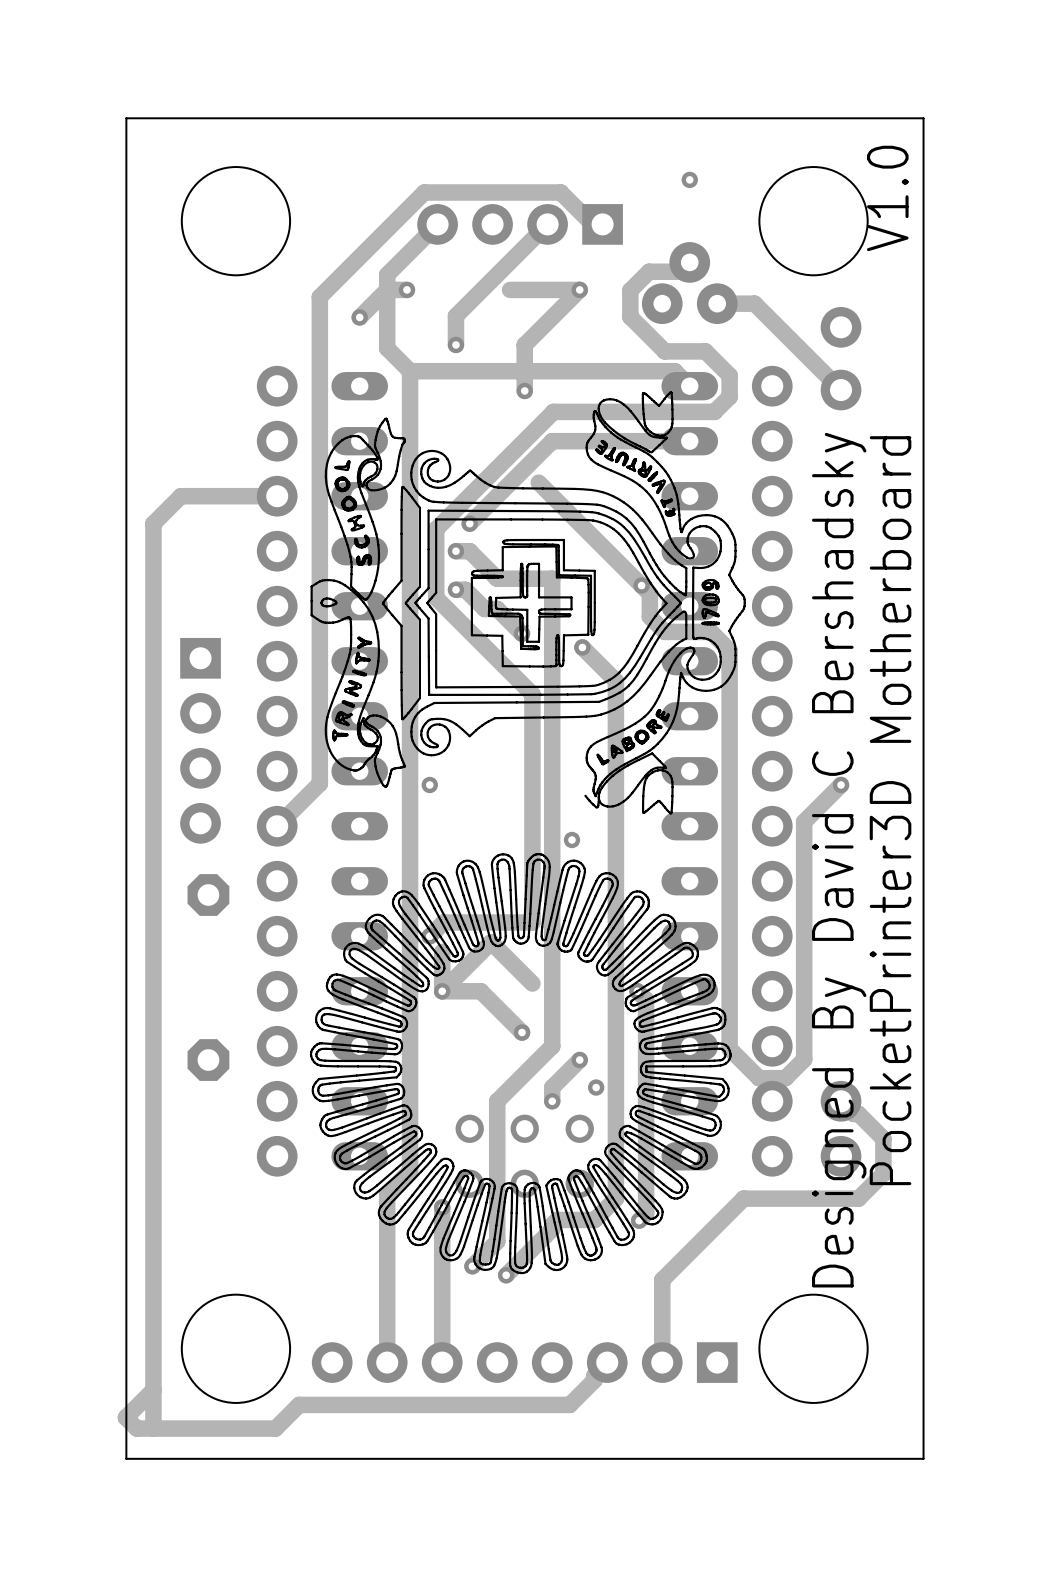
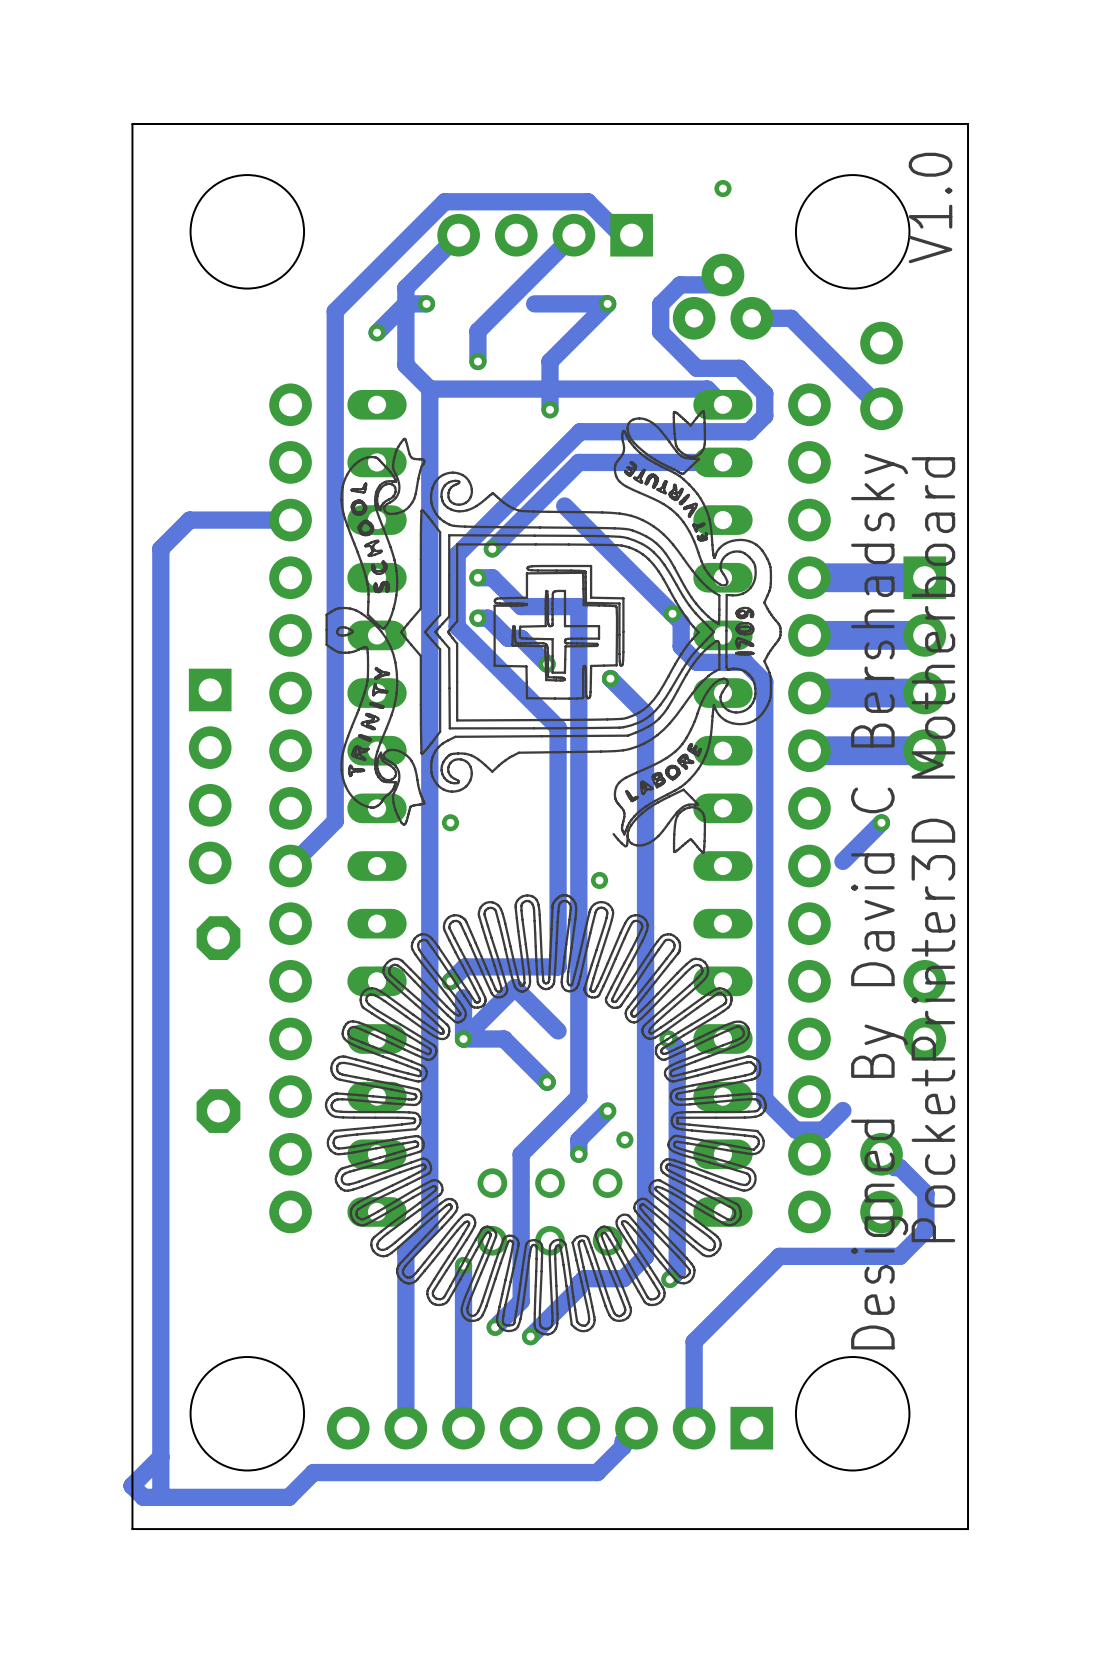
track: none -> (924, 577) (809, 577)
track: none -> (924, 635) (809, 635)
part: none -> (924, 664)
track: none -> (924, 693) (809, 693)
track: none -> (924, 750) (809, 750)
track: (804, 821) (804, 1059) -> none
part: none -> (924, 1010)

